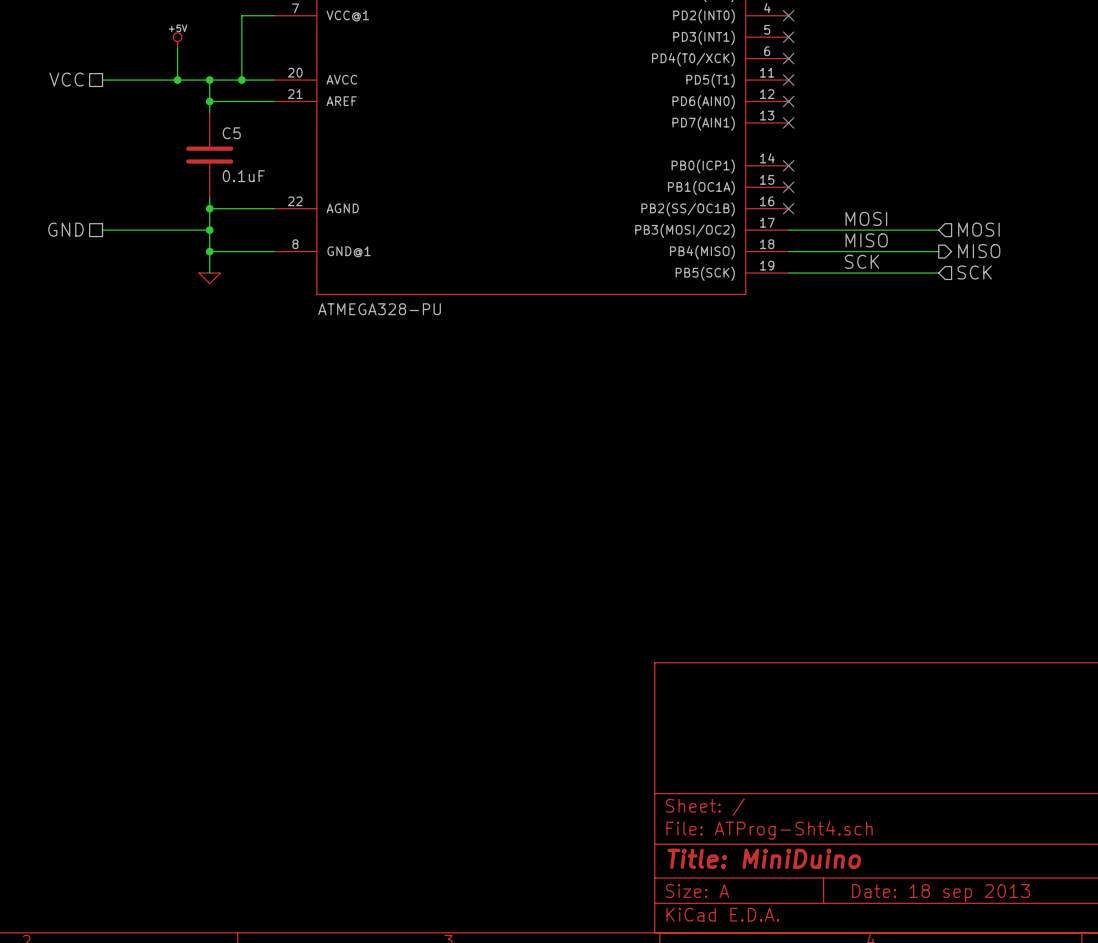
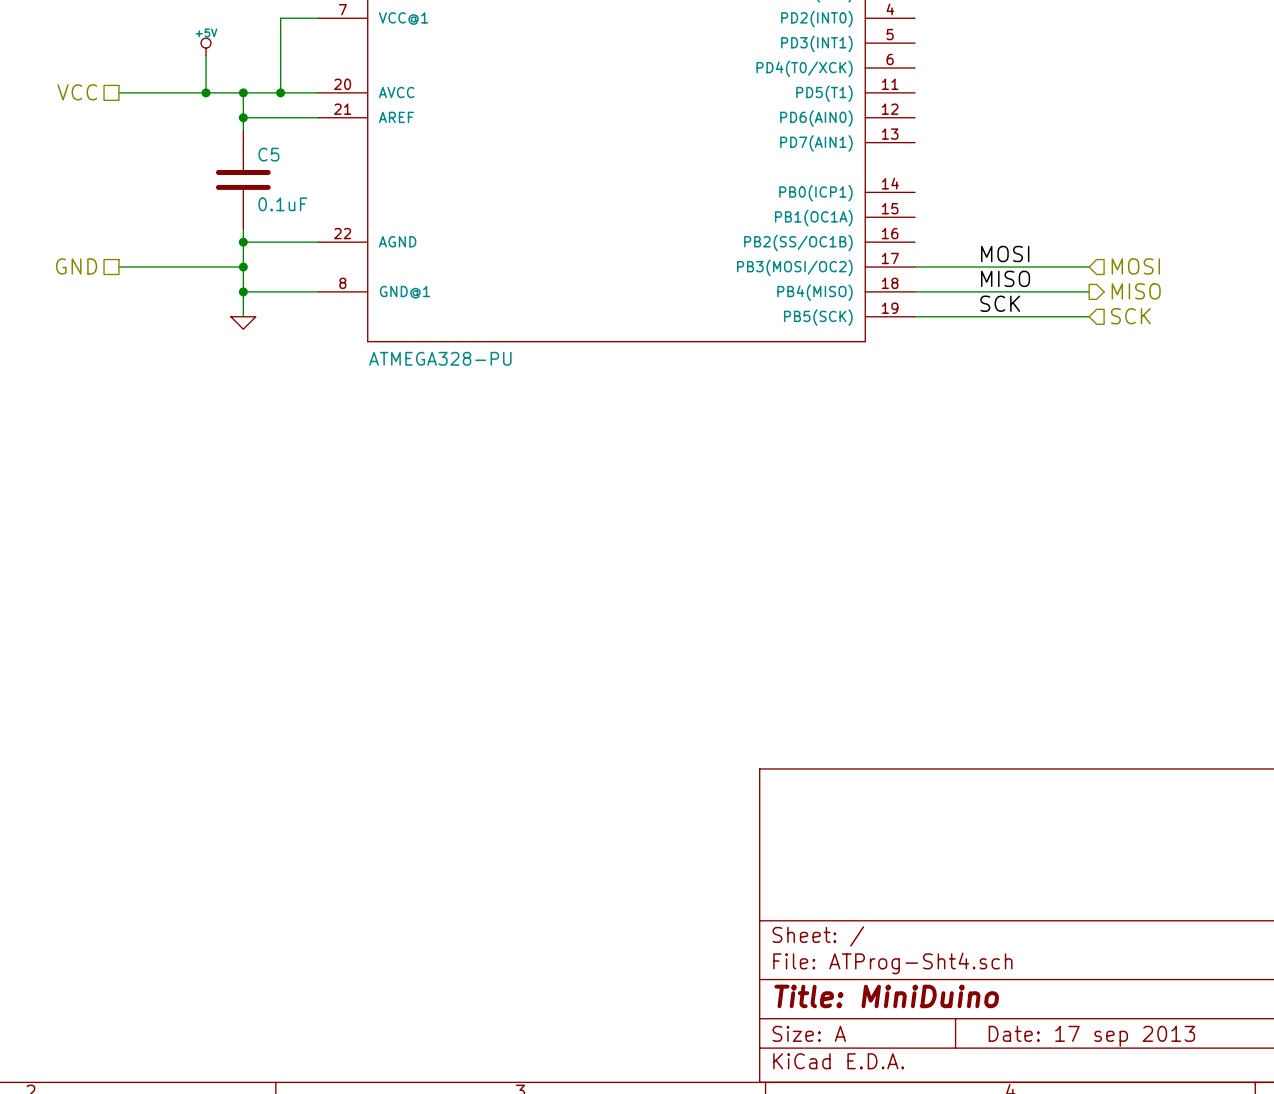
no-connect mark: (788, 15) -> none
no-connect mark: (788, 37) -> none
no-connect mark: (788, 58) -> none
no-connect mark: (788, 80) -> none
no-connect mark: (788, 101) -> none
no-connect mark: (788, 122) -> none
no-connect mark: (788, 165) -> none
no-connect mark: (788, 187) -> none
no-connect mark: (788, 208) -> none
title block: Date: 18 sep 2013 (941, 893) -> Date: 17 sep 2013 (1091, 1036)

